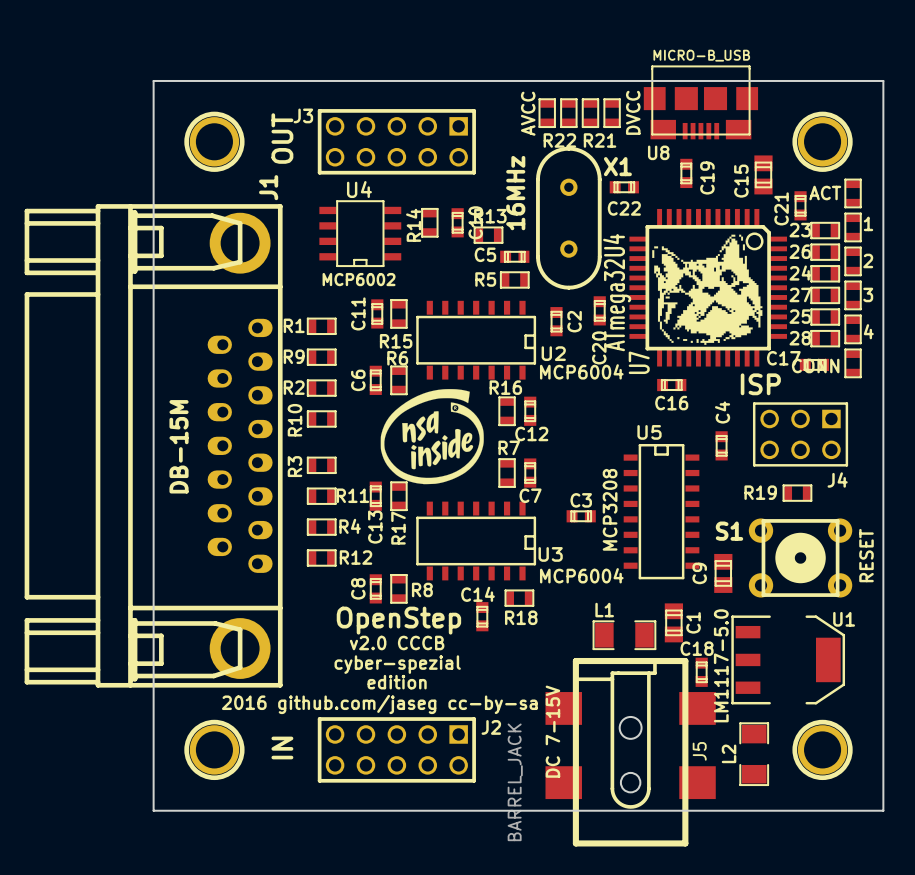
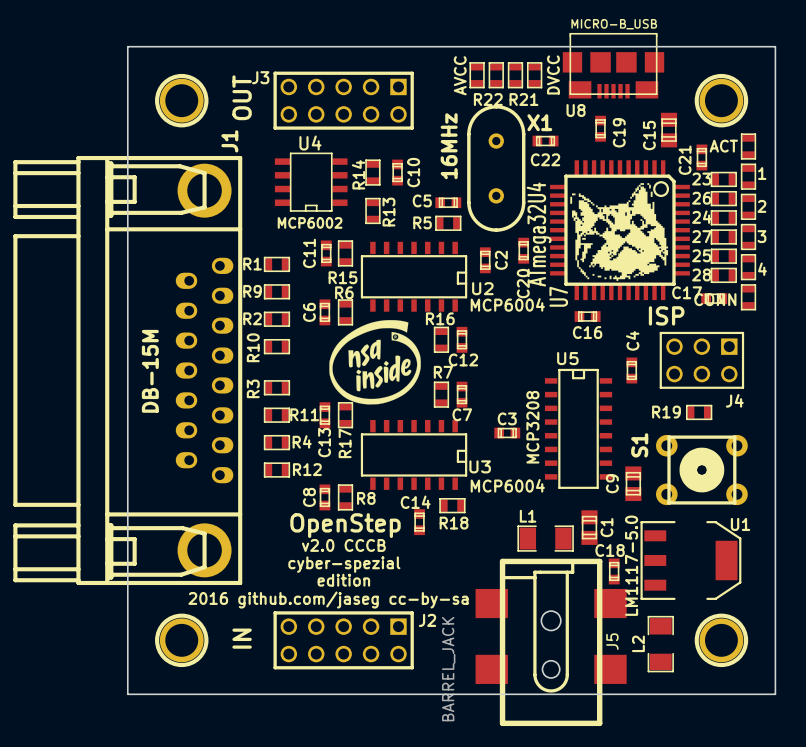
R13 rotation: 0° (488, 235) -> 90° clockwise (372, 210)
R13 position: (488, 235) -> (372, 210)
S1 name rotation: 0° (729, 531) -> 90° counterclockwise (639, 445)
text: RESET (866, 555) -> none
text: DC 7-15V (552, 731) -> none

